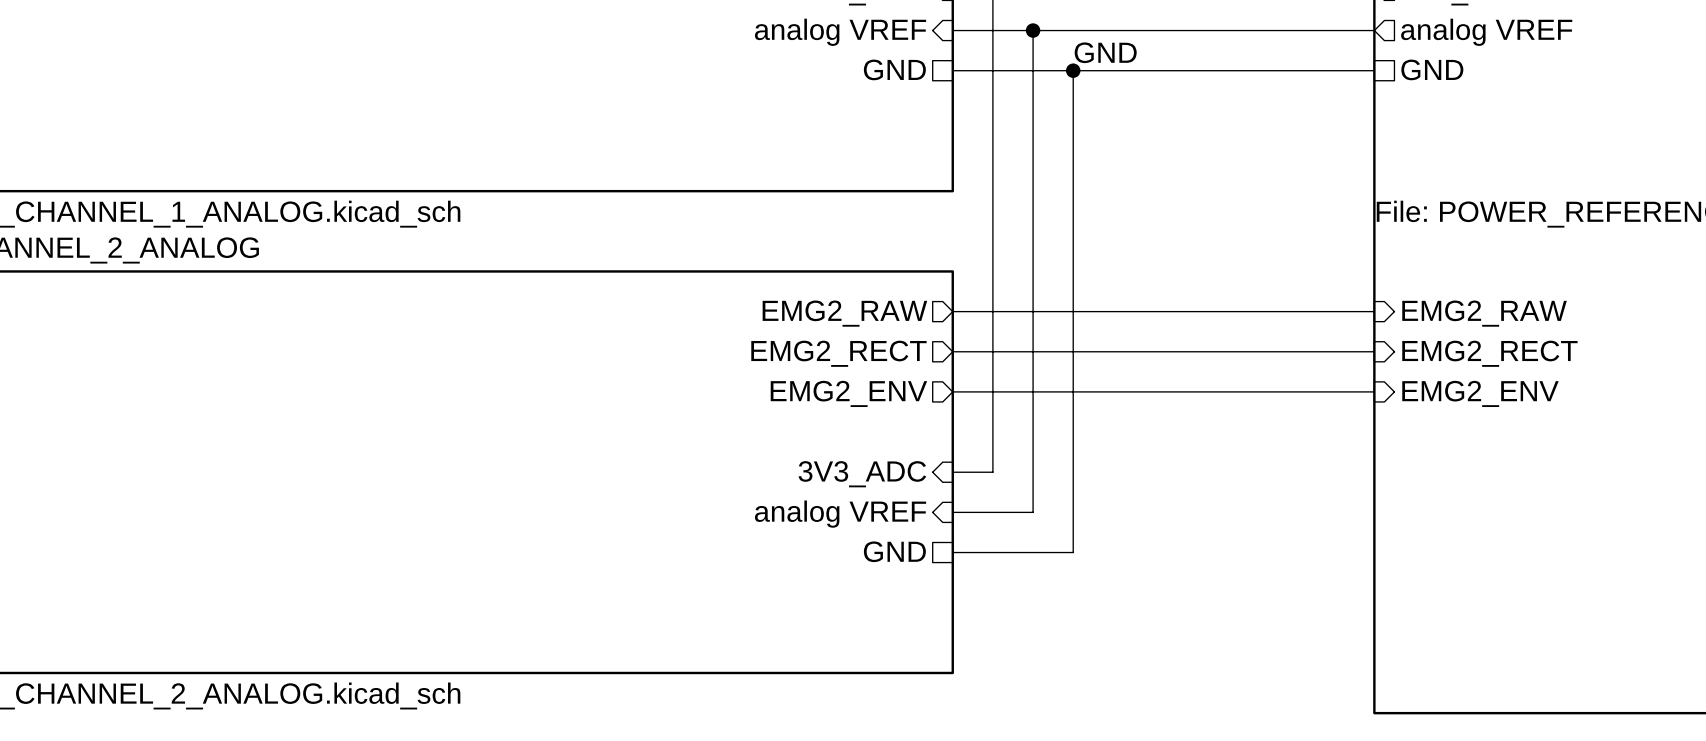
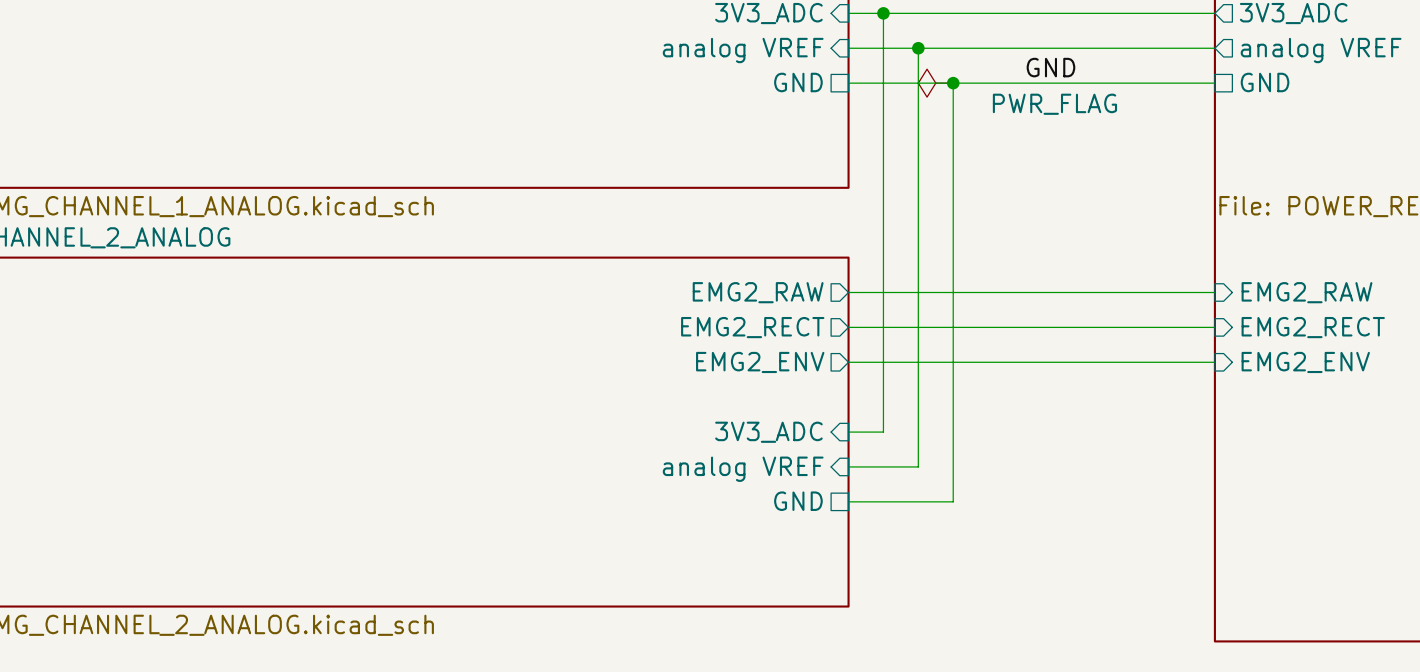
label position: GND (1105, 52) -> GND (1050, 67)
power symbol: none -> PWR_FLAG (935, 83)

